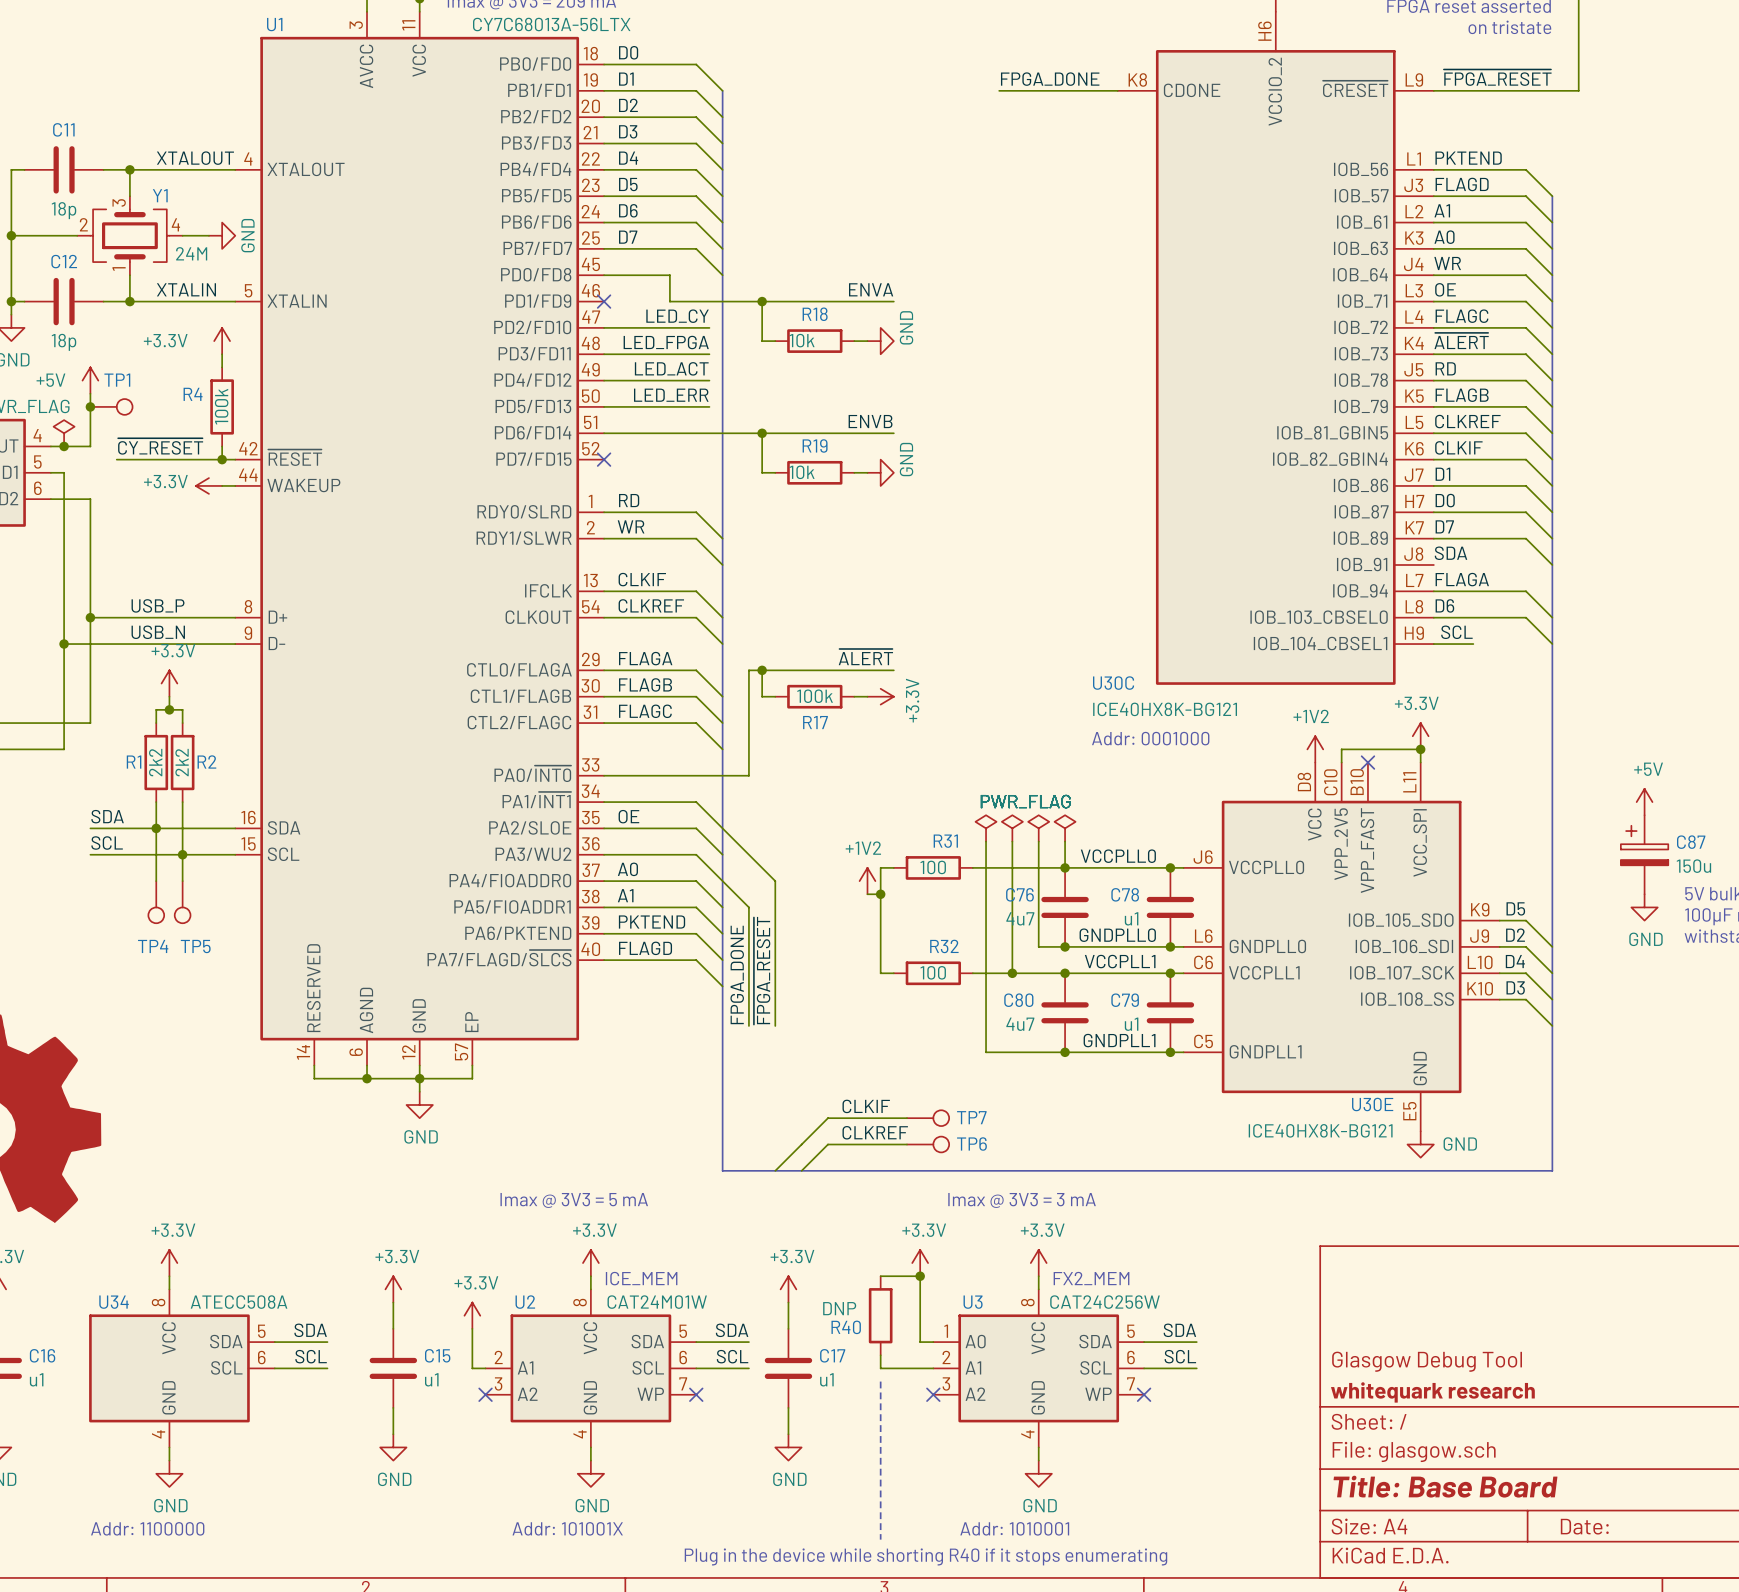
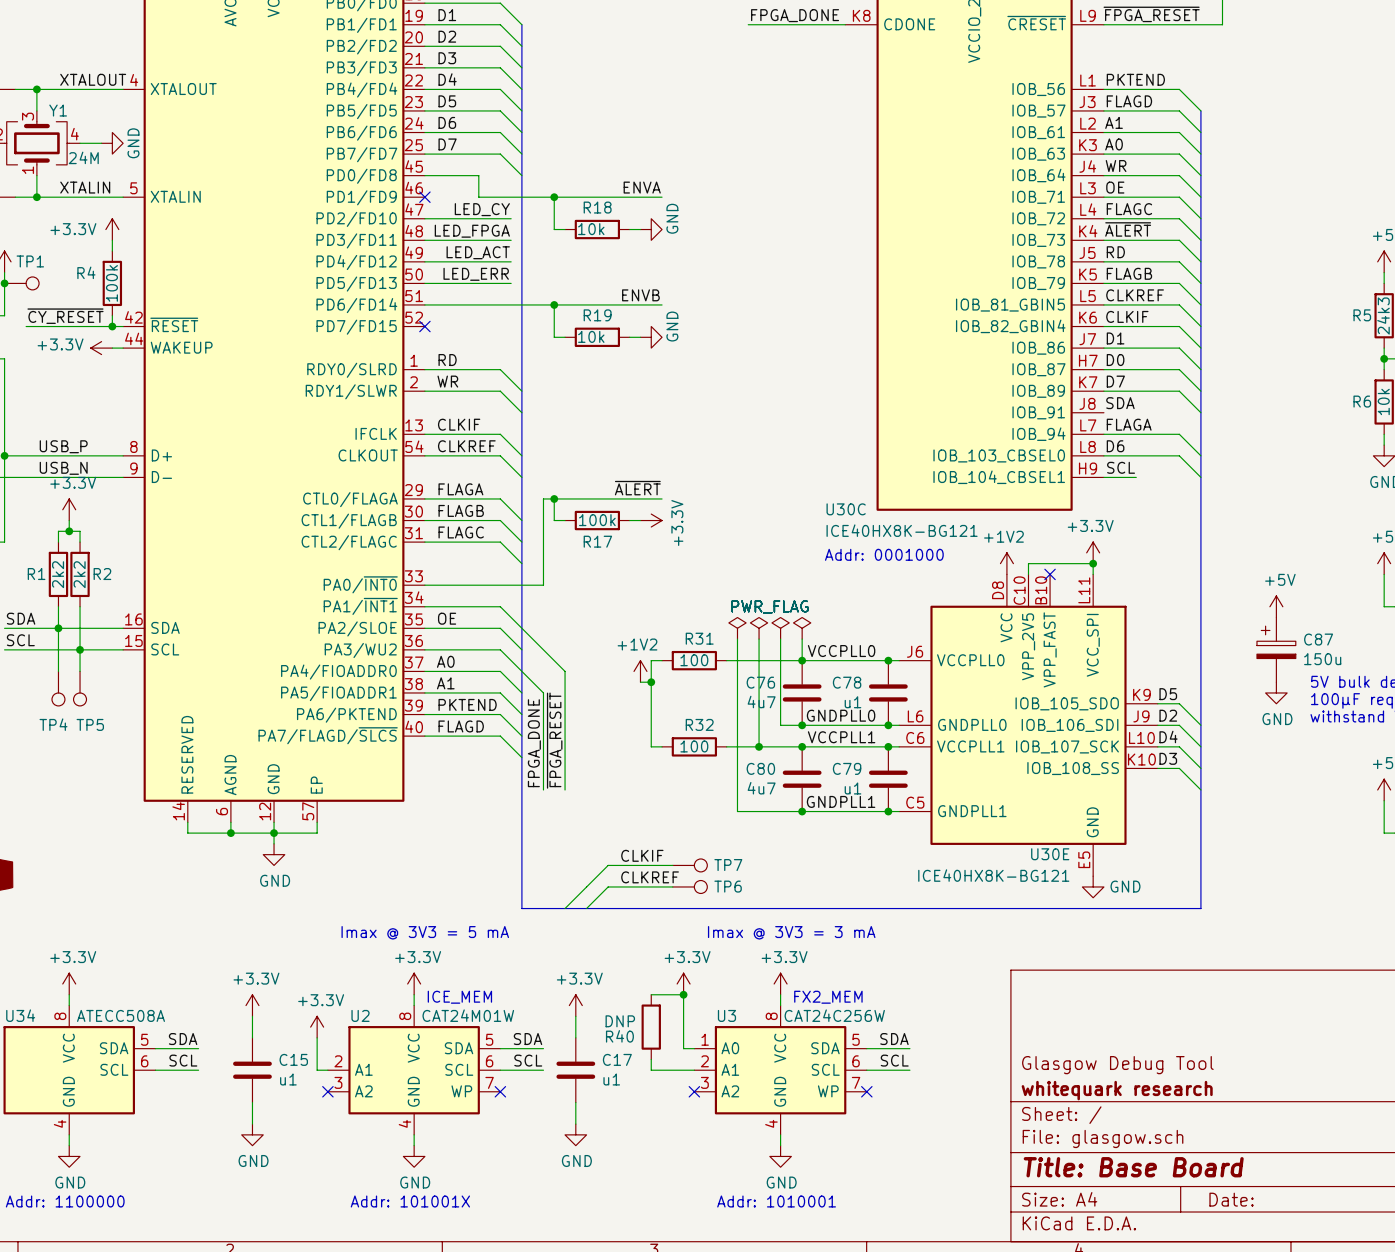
line: (880, 1381) (880, 1539) -> none
text: Plug in the device while shorting R40 if it stops enumerating (925, 1556) -> none

